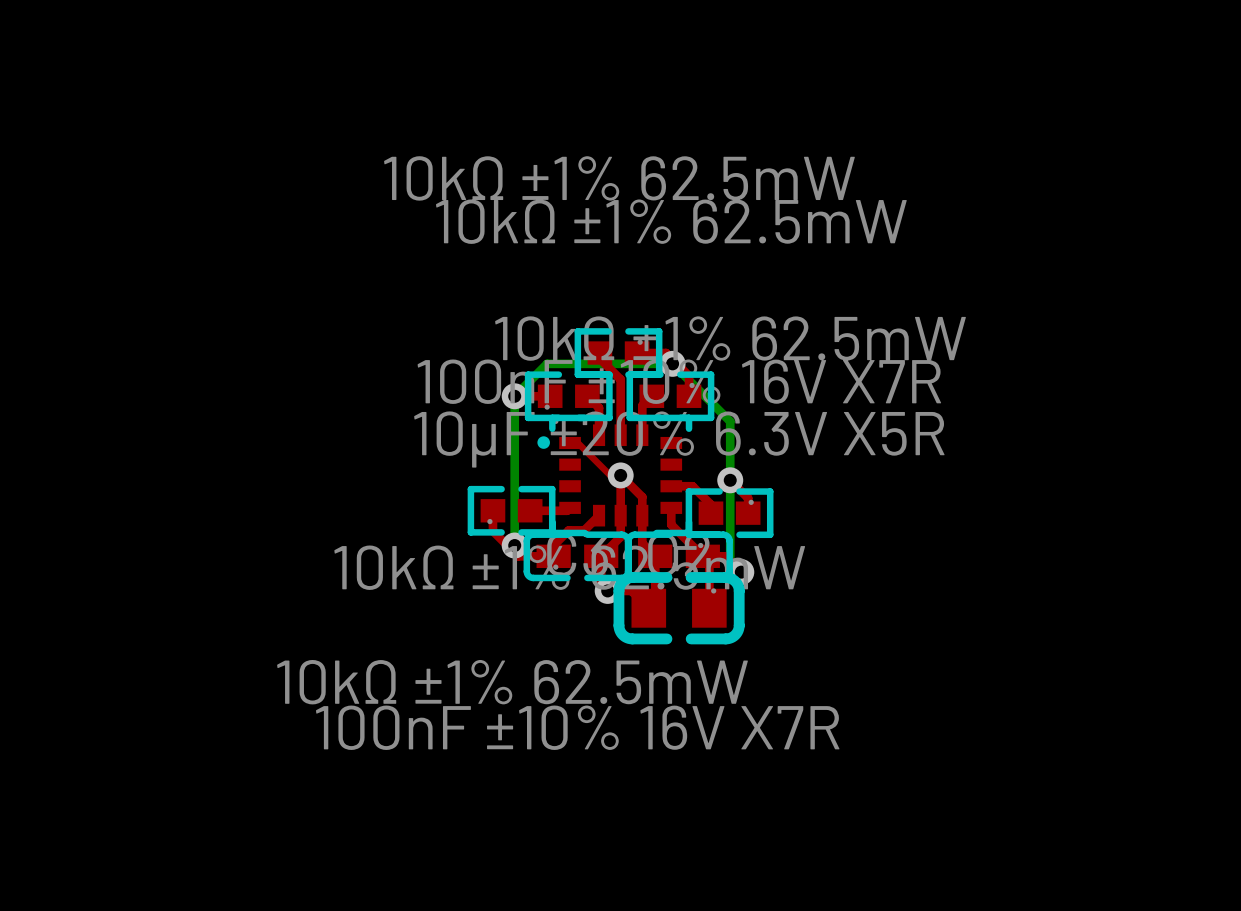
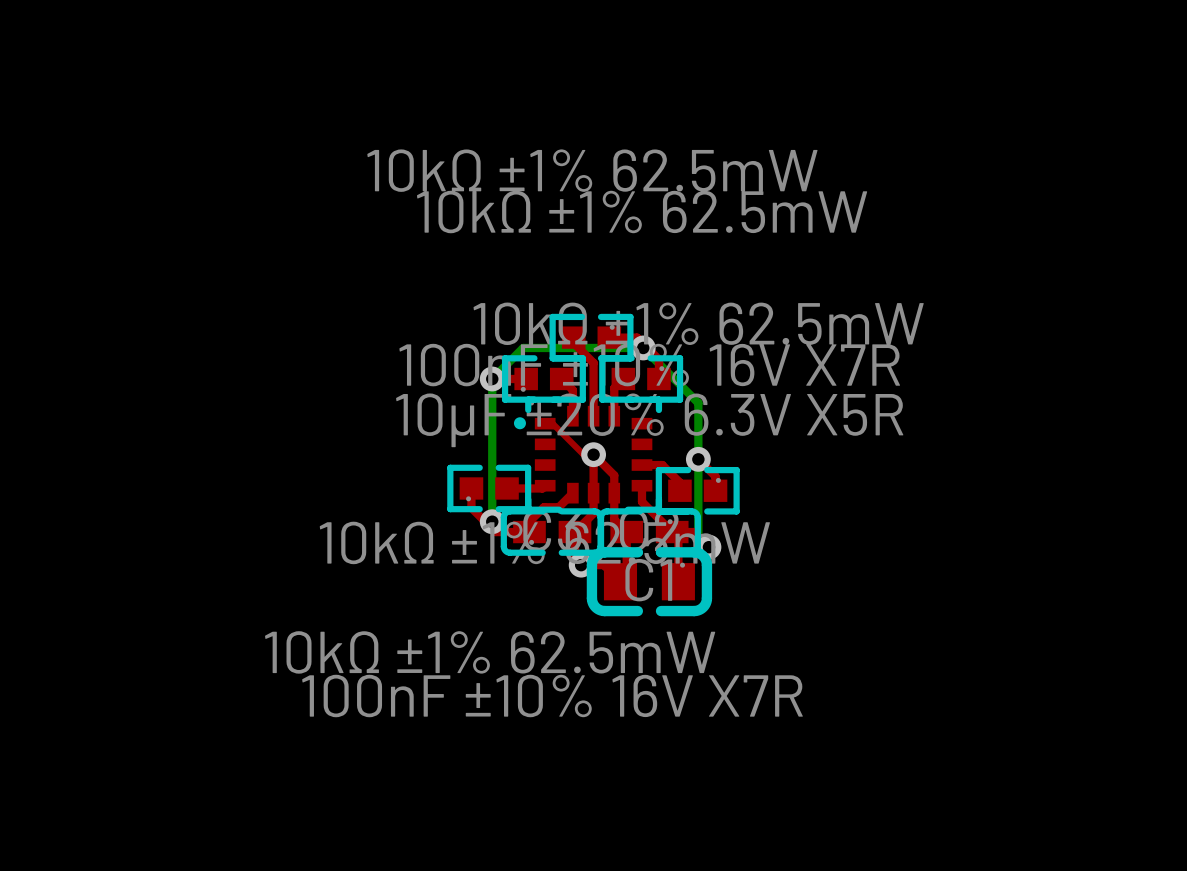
C1 name: none -> C1 (648, 580)

